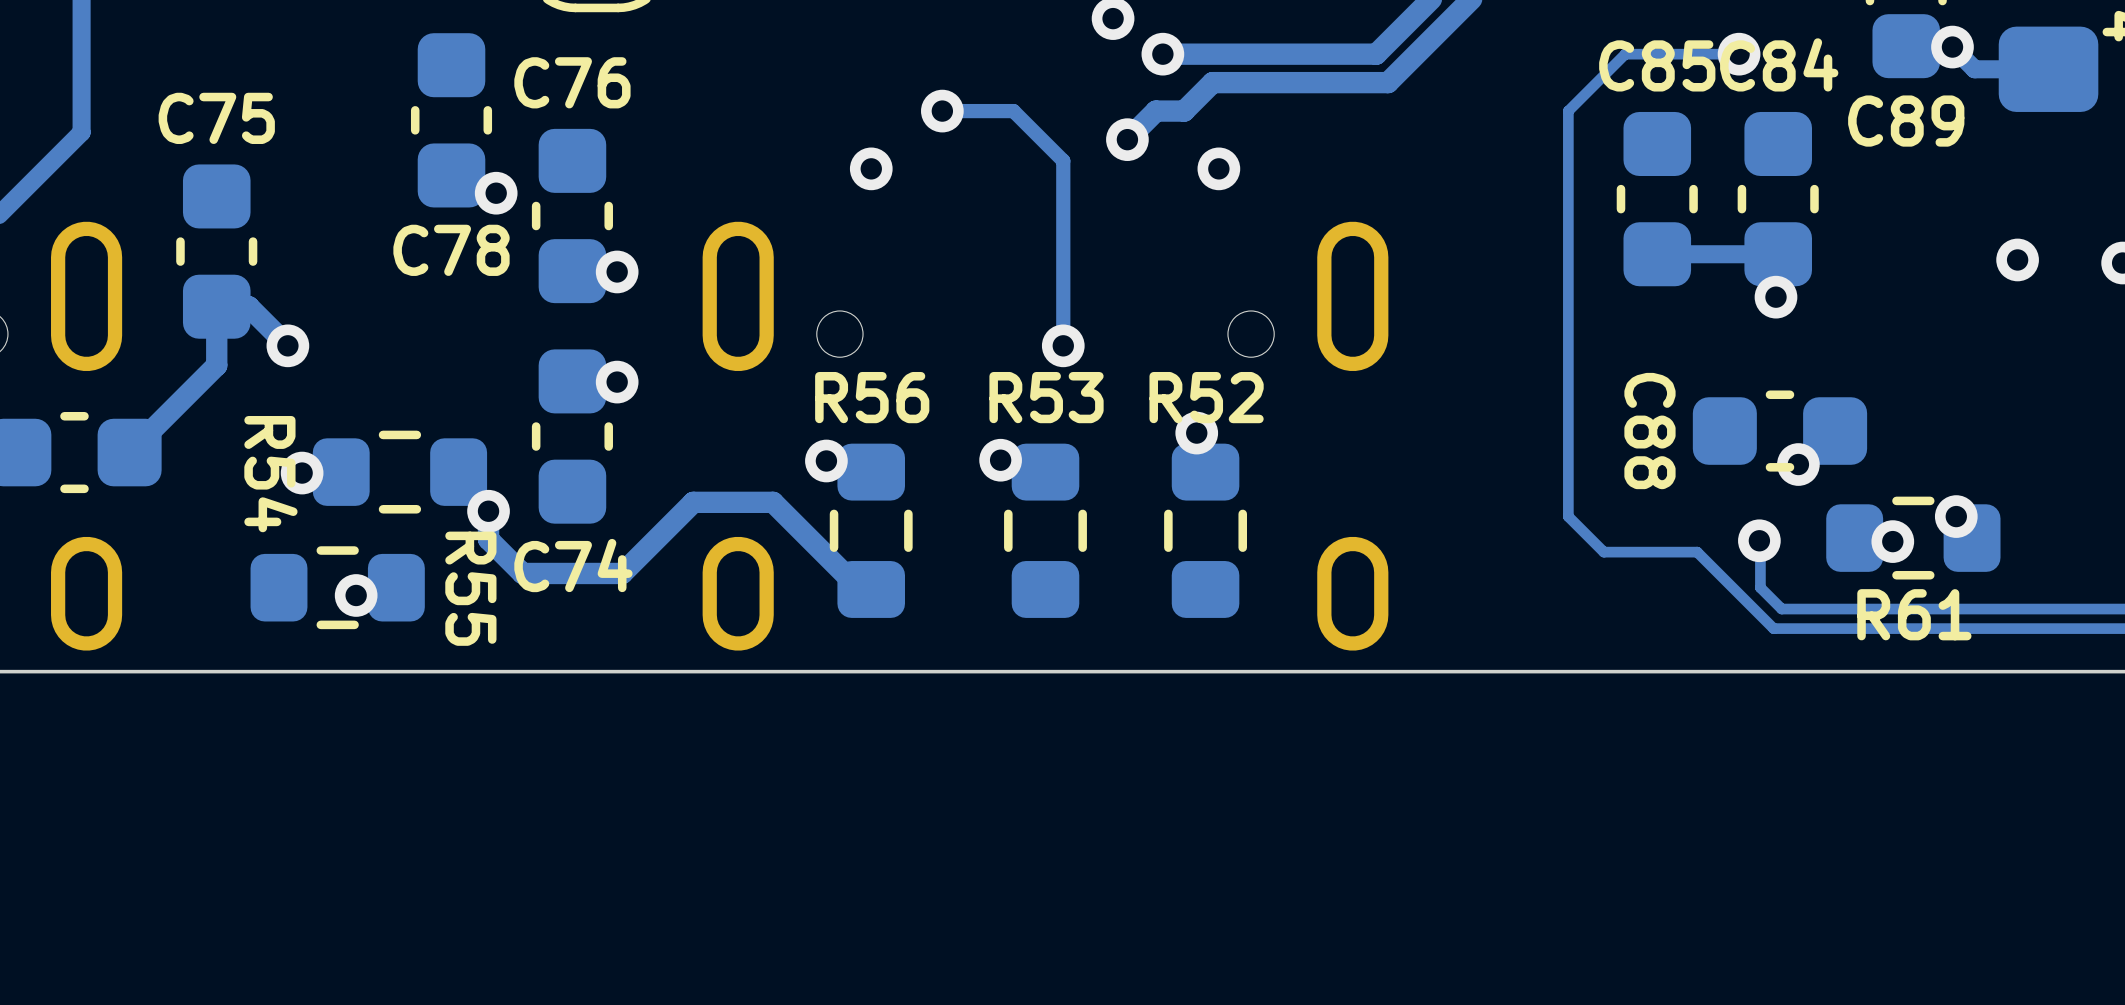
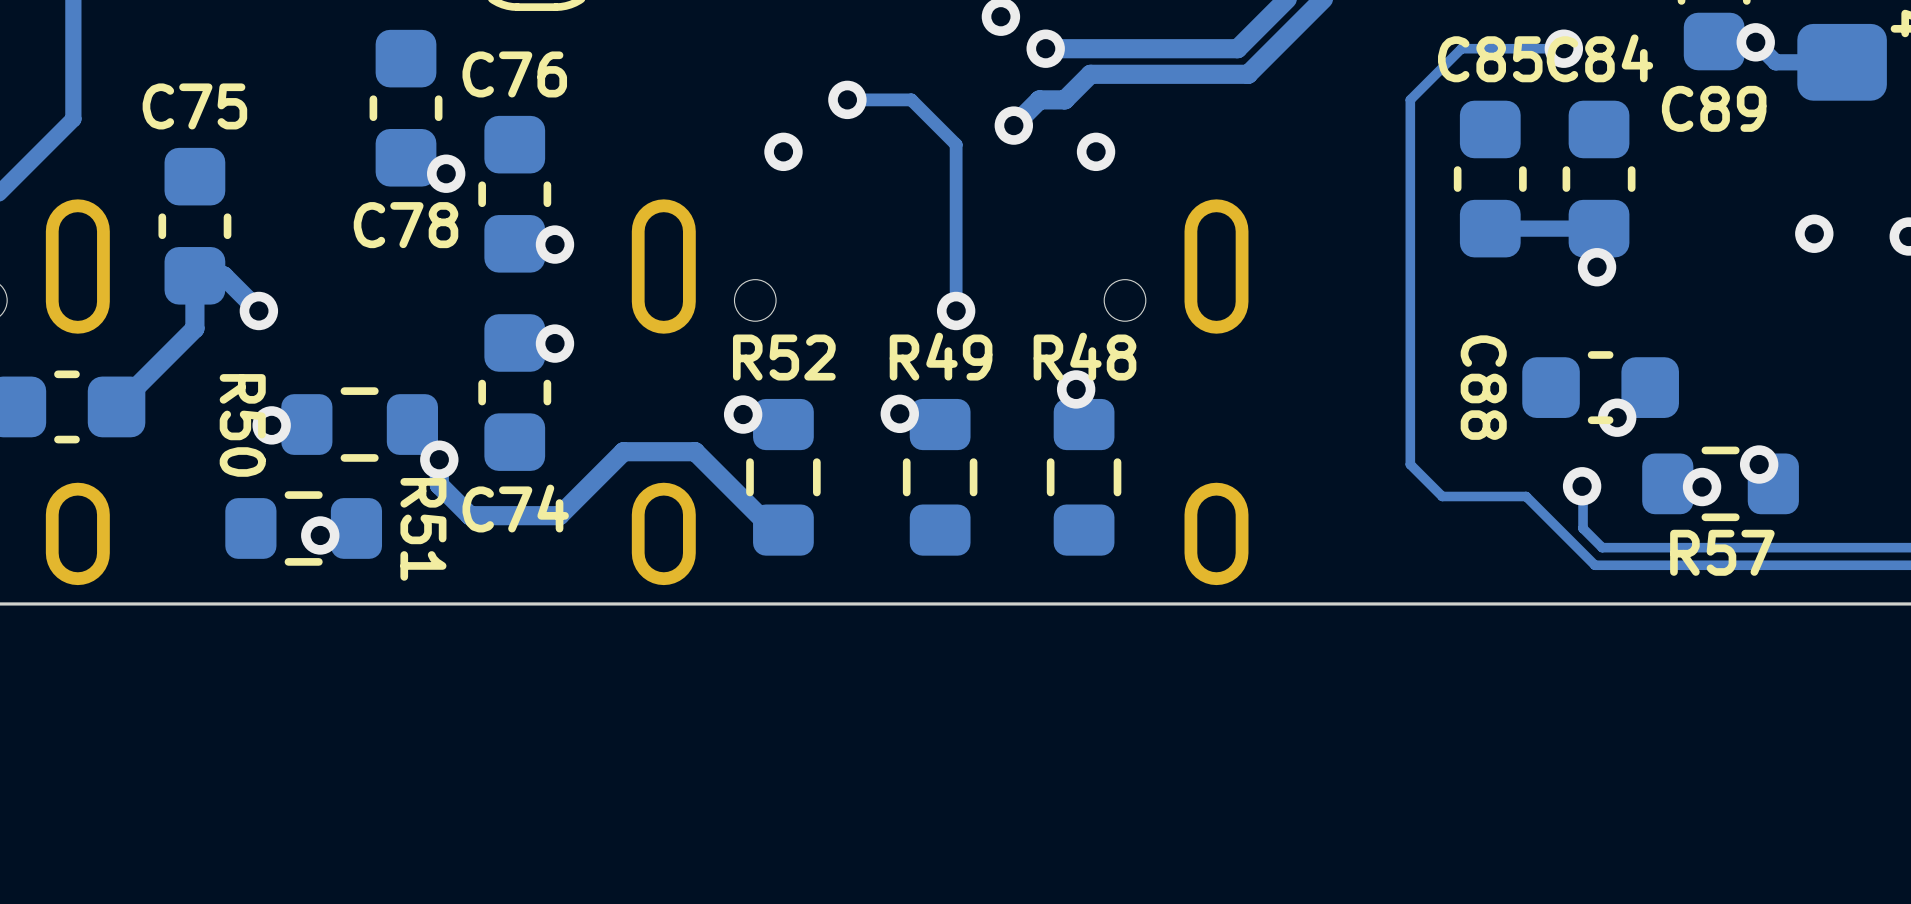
R56 name: R56 (872, 397) -> R52 (784, 357)
R53 name: R53 (1046, 397) -> R49 (941, 356)
R52 name: R52 (1206, 397) -> R48 (1084, 356)
R54 name: R54 (270, 474) -> R50 (242, 425)
R55 name: R55 (470, 588) -> R51 (423, 529)
R61 name: R61 (1914, 614) -> R57 (1722, 552)

